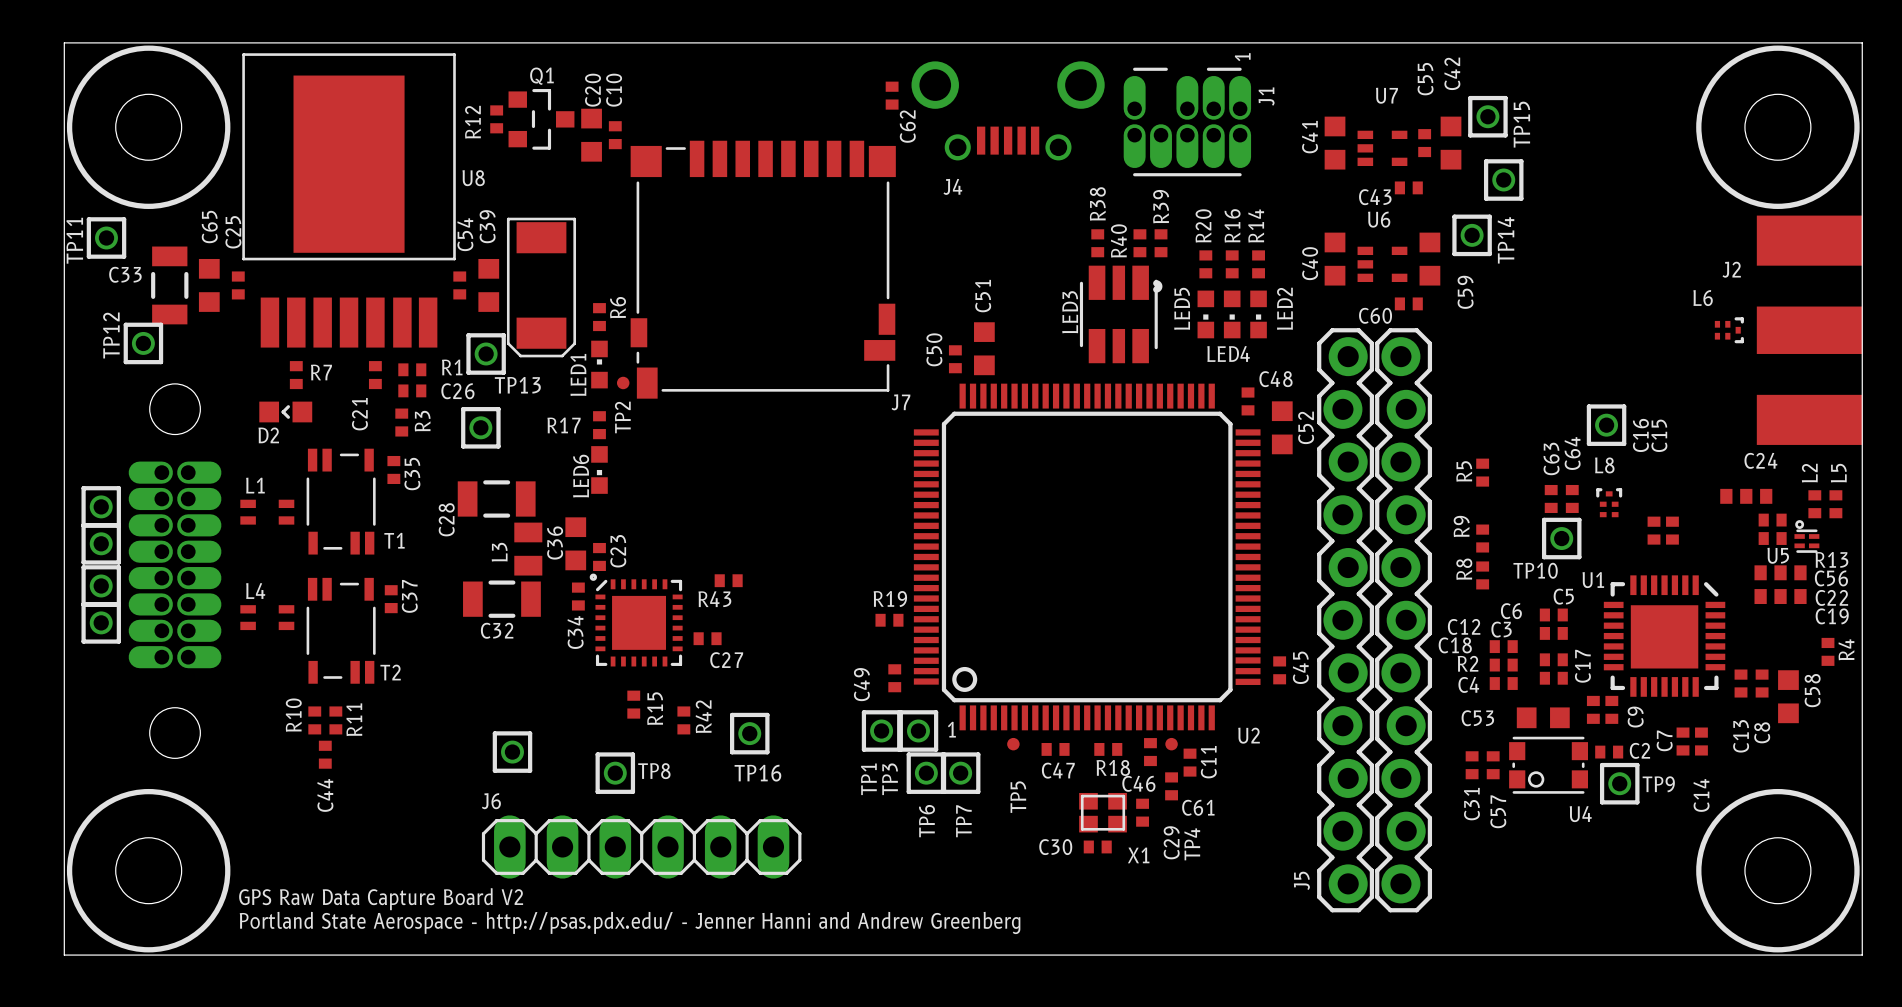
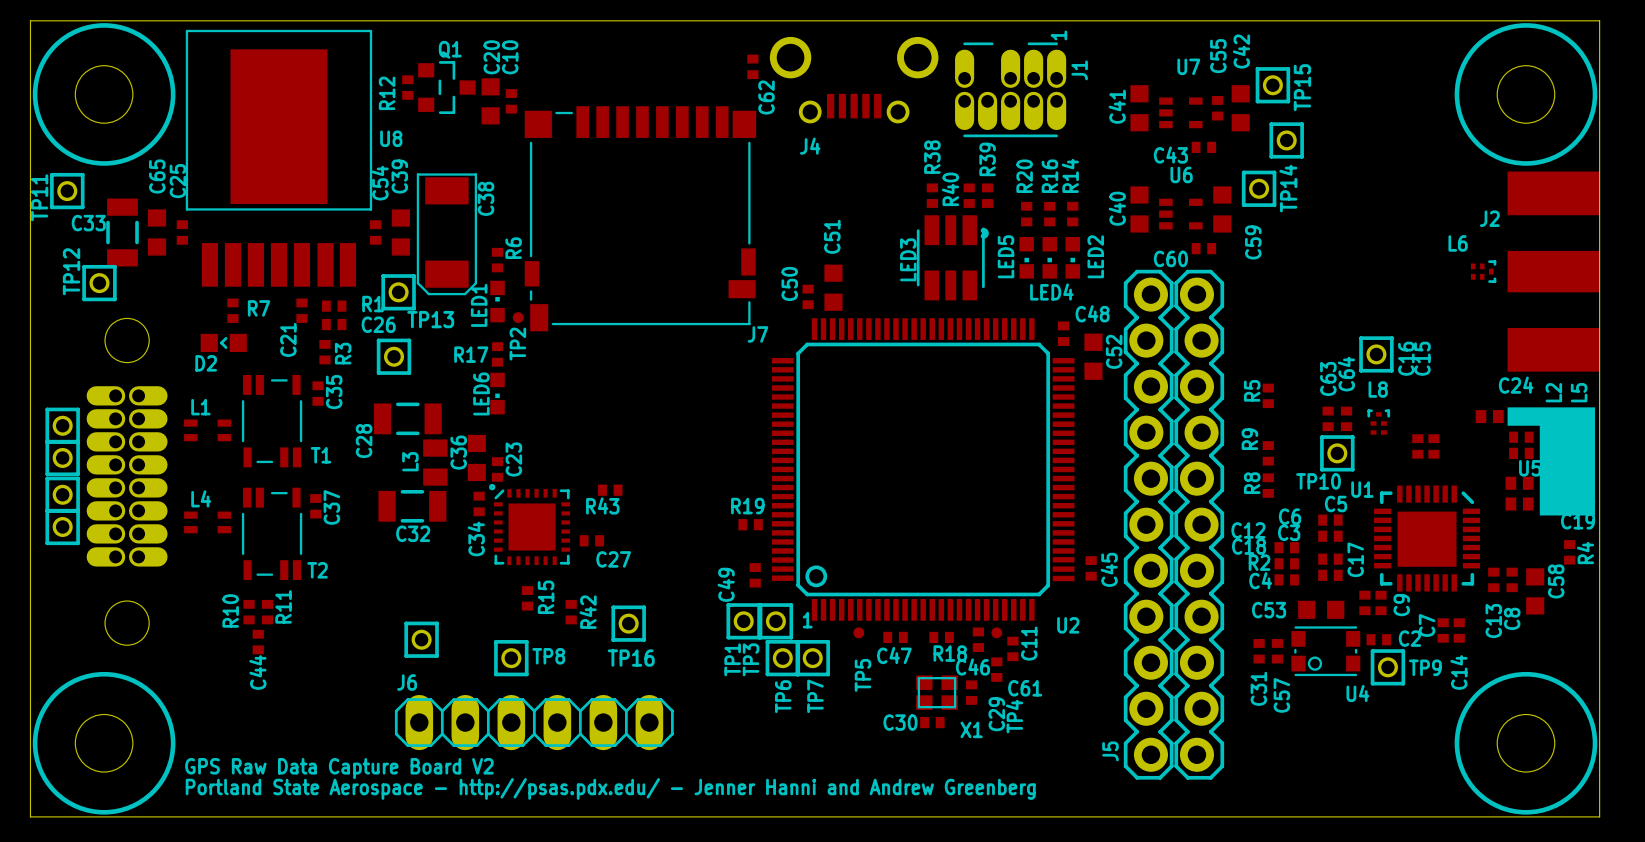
C38 name: none -> C38 (486, 198)
drawing: none -> [1507, 407, 1596, 516]

